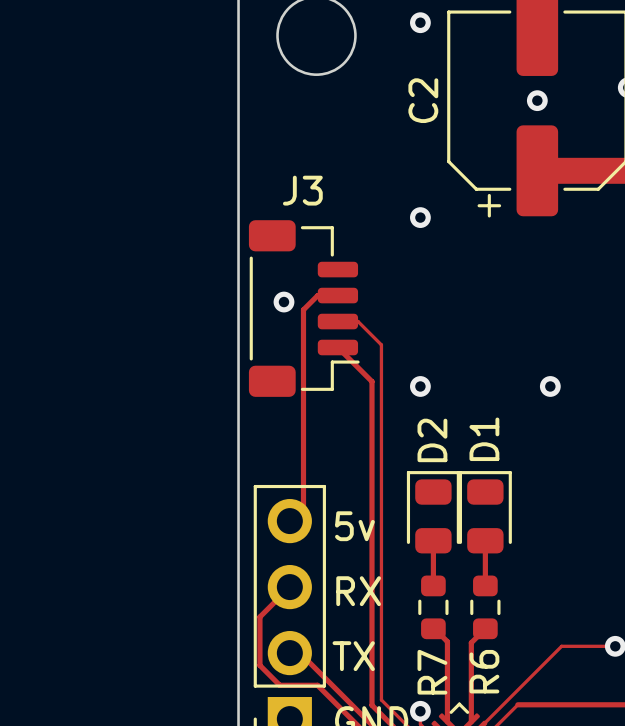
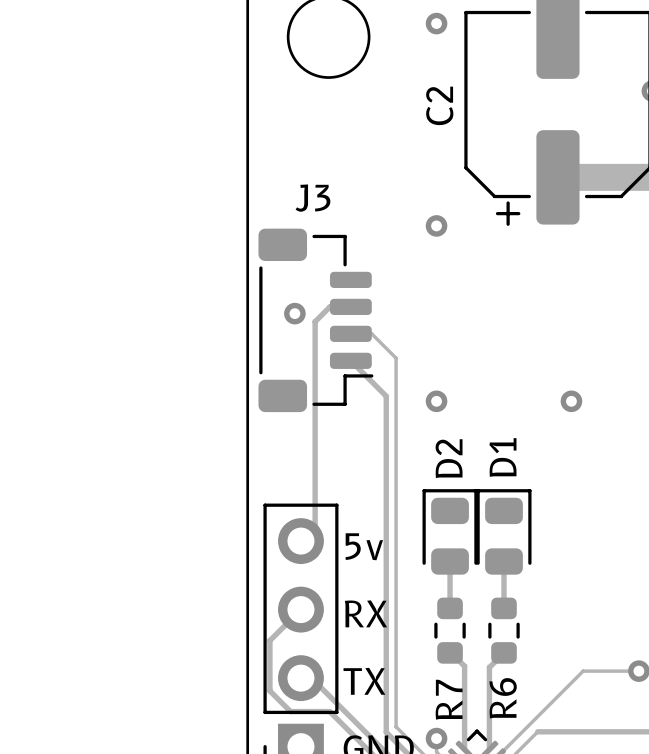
via: (537, 100) -> none

